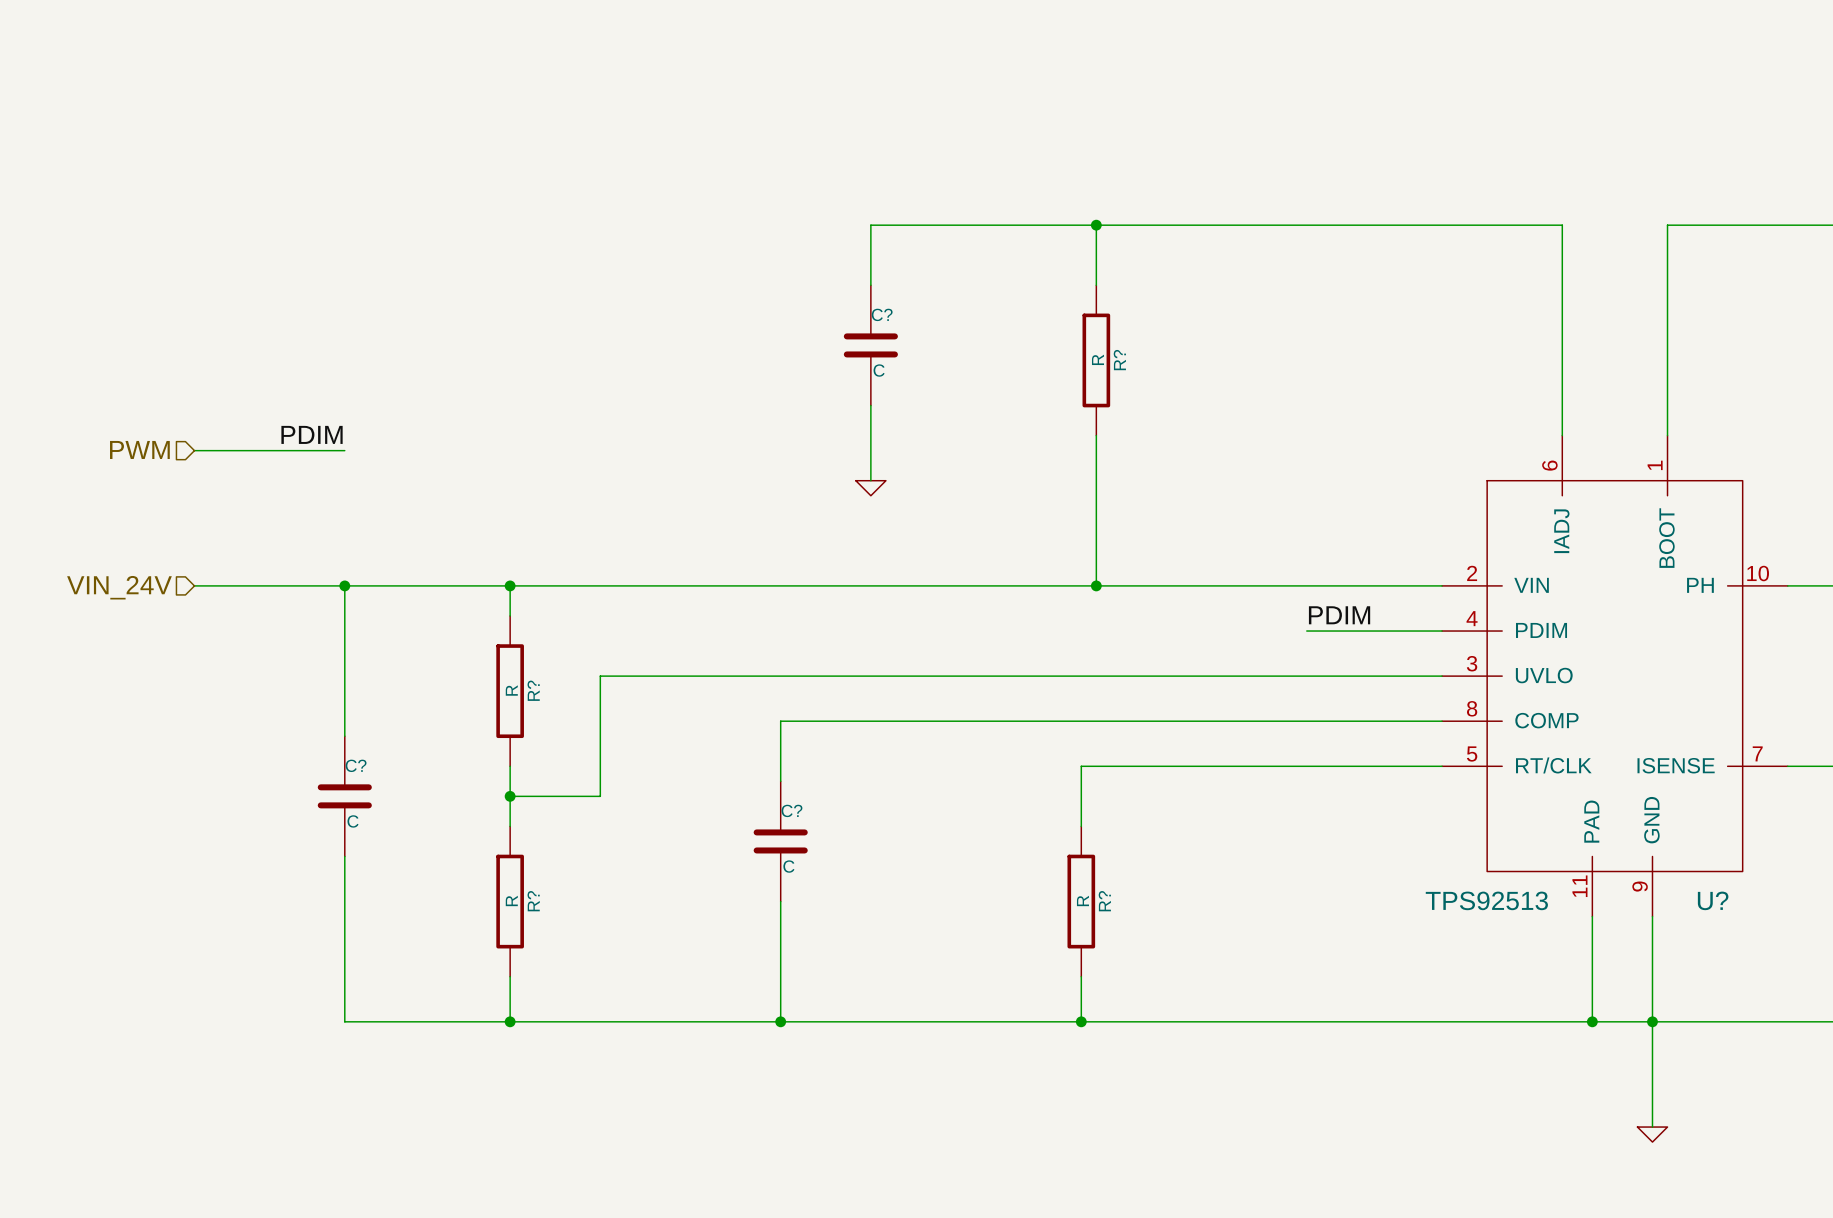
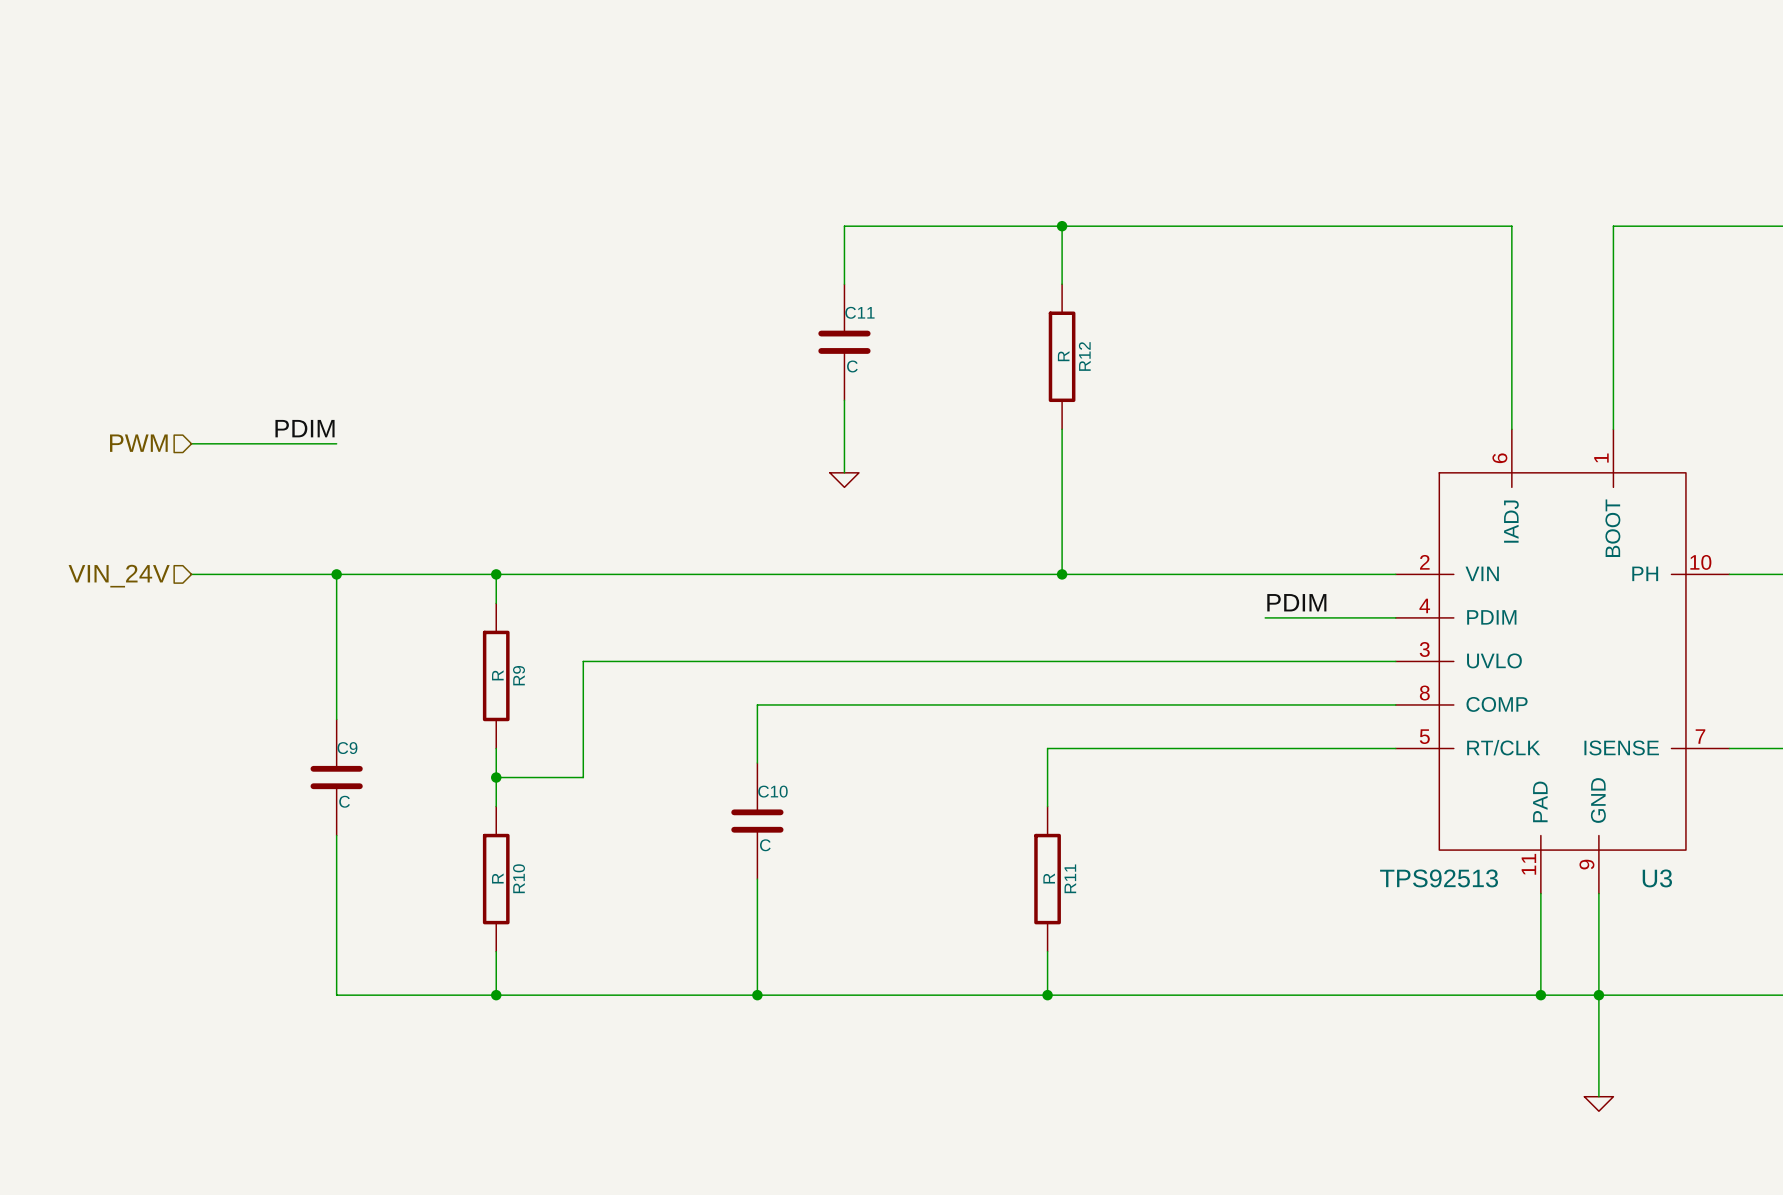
C? name: C? (882, 314) -> C11 (859, 312)
R? name: R? (1119, 360) -> R12 (1084, 356)
R? name: R? (533, 690) -> R9 (519, 675)
C? name: C? (356, 765) -> C9 (347, 748)
C? name: C? (791, 810) -> C10 (772, 791)
U? name: U? (1713, 900) -> U3 (1657, 878)
R? name: R? (533, 901) -> R10 (519, 878)
R? name: R? (1104, 901) -> R11 (1070, 878)

